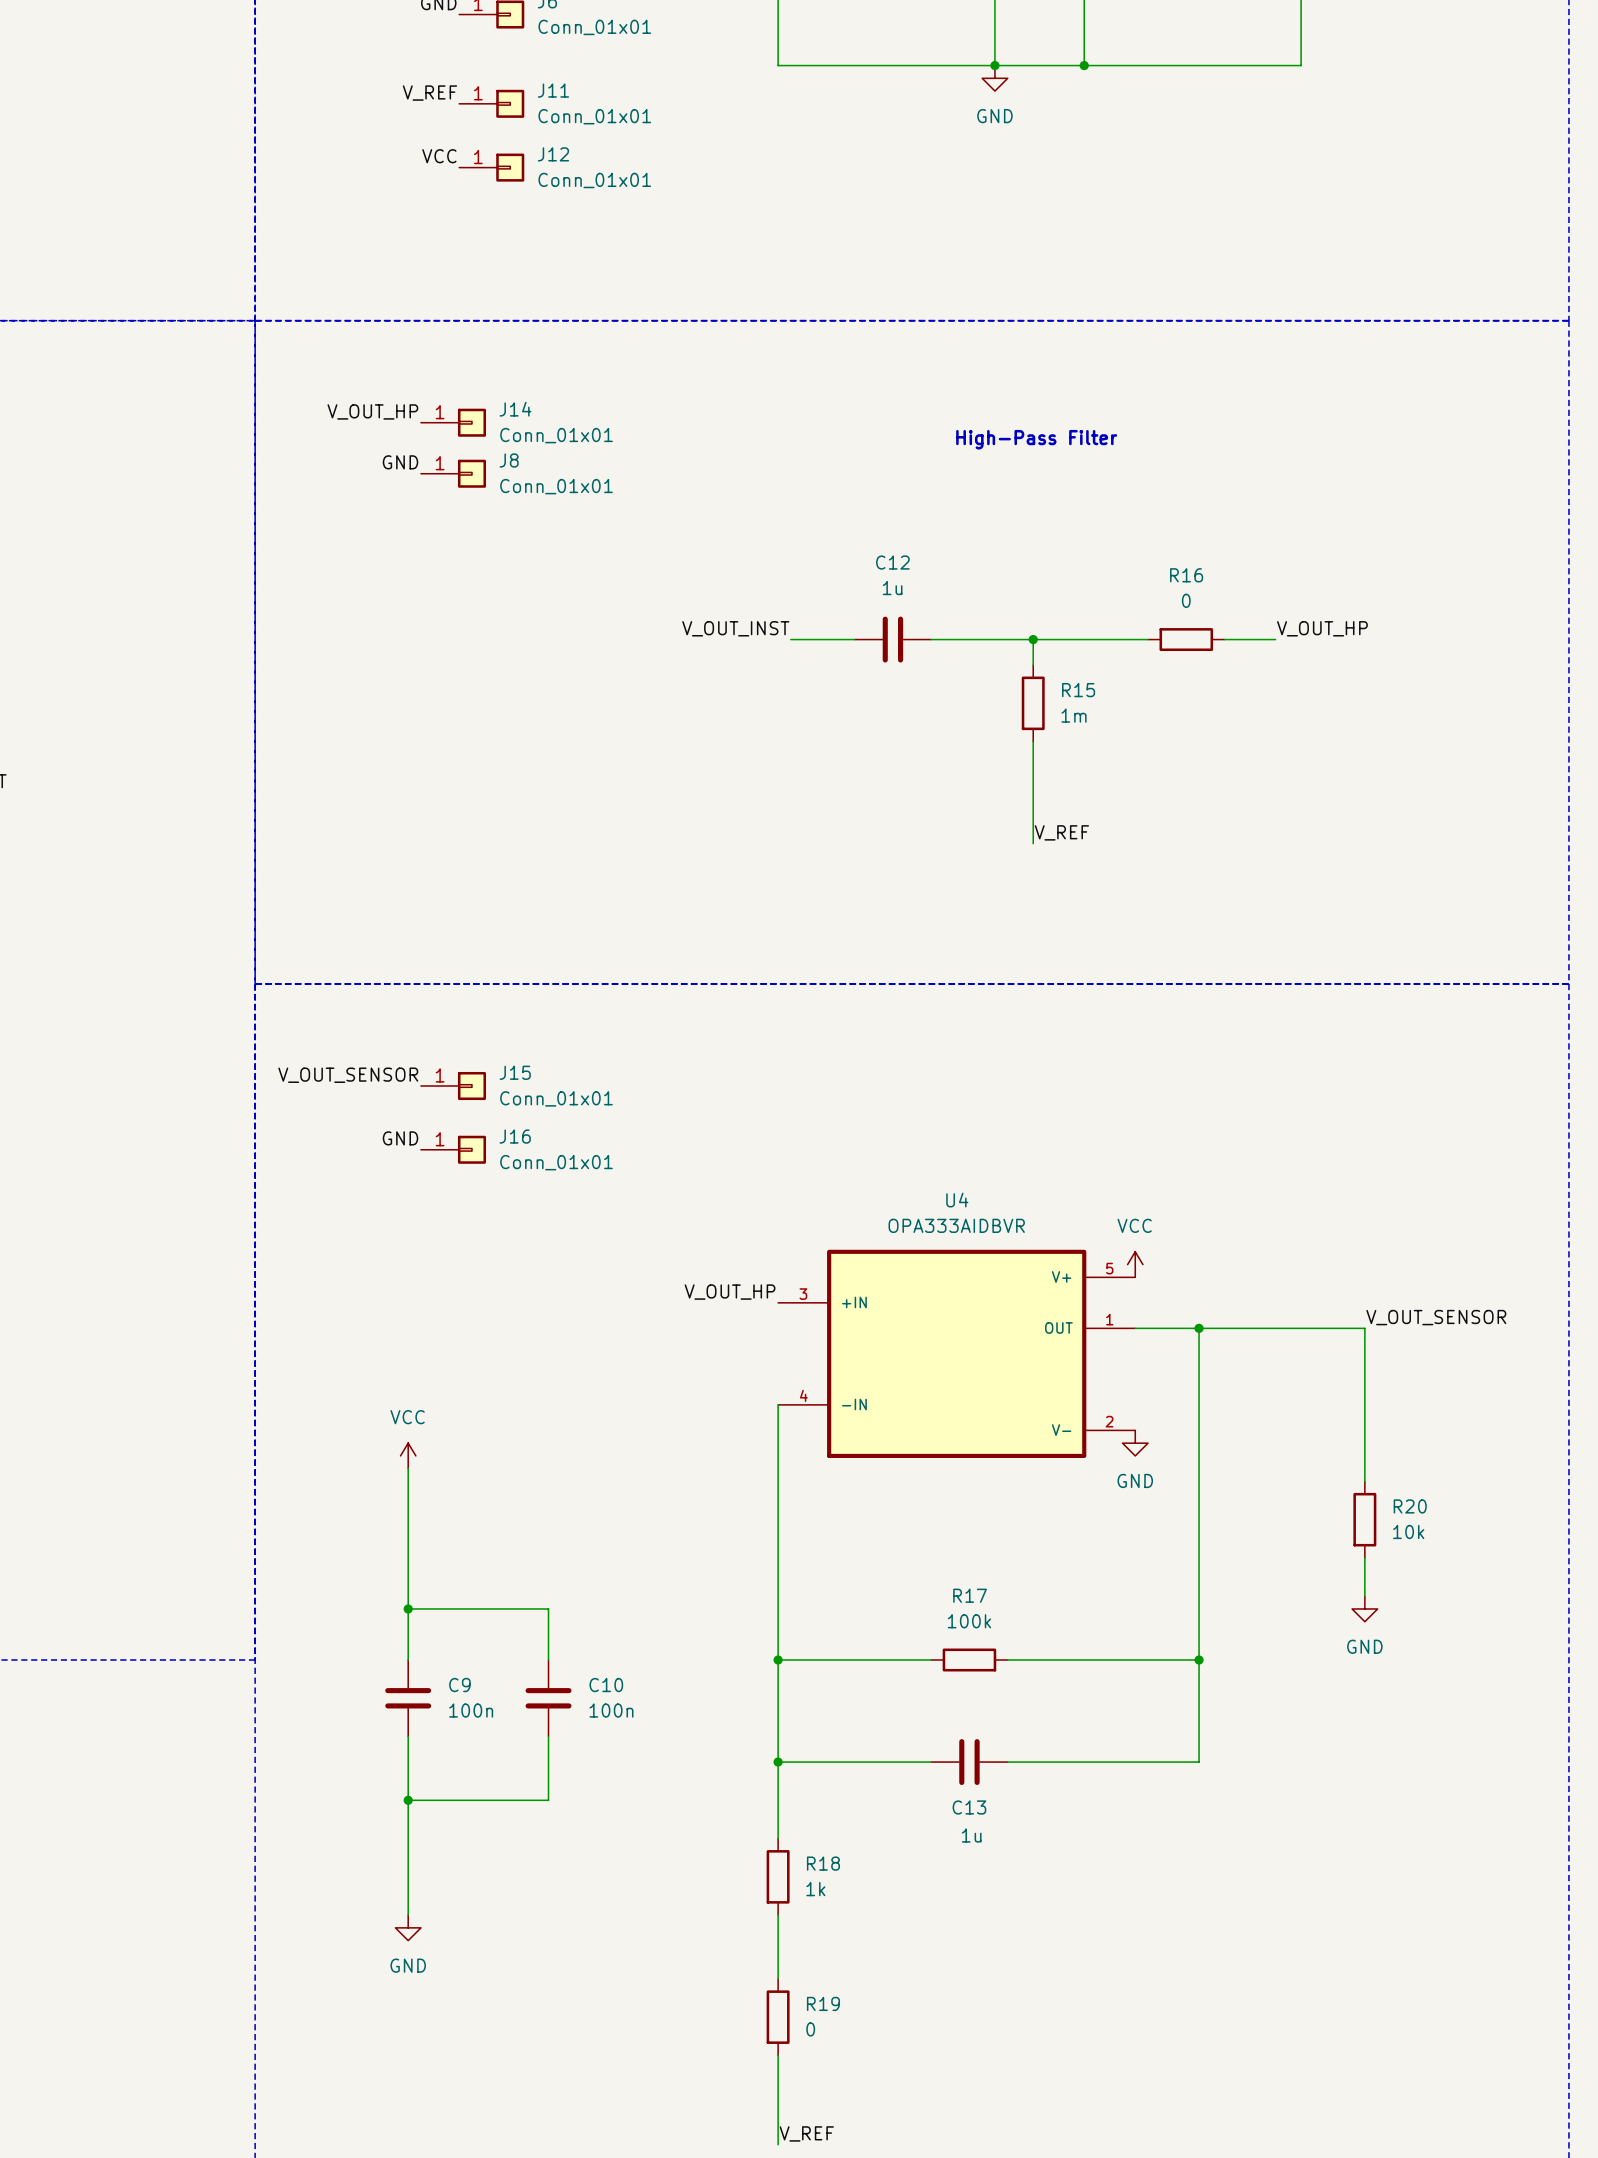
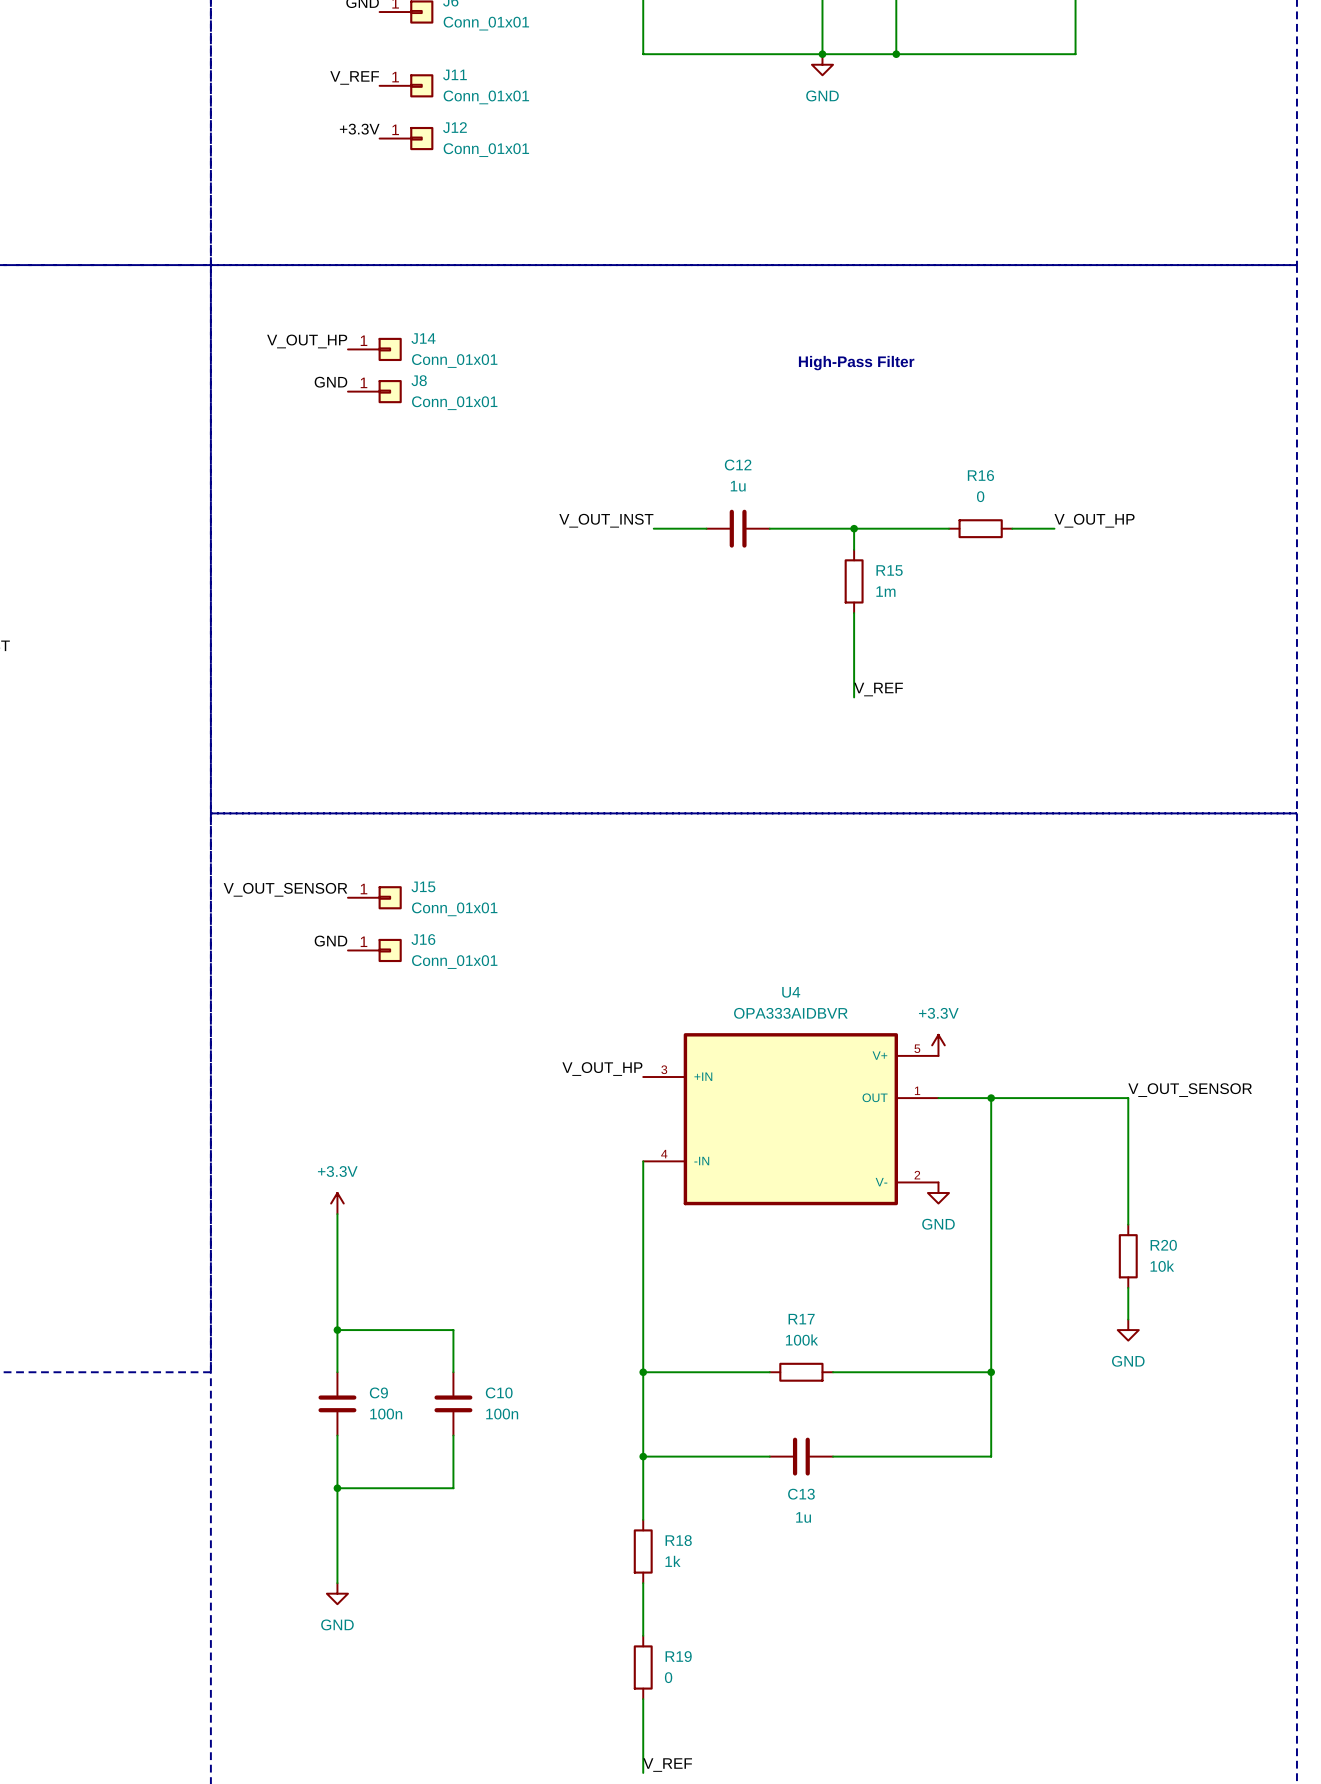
label: VCC (439, 156) -> +3.3V (359, 129)
power symbol: VCC (1135, 1264) -> +3.3V (938, 1045)
power symbol: VCC (408, 1455) -> +3.3V (337, 1203)

